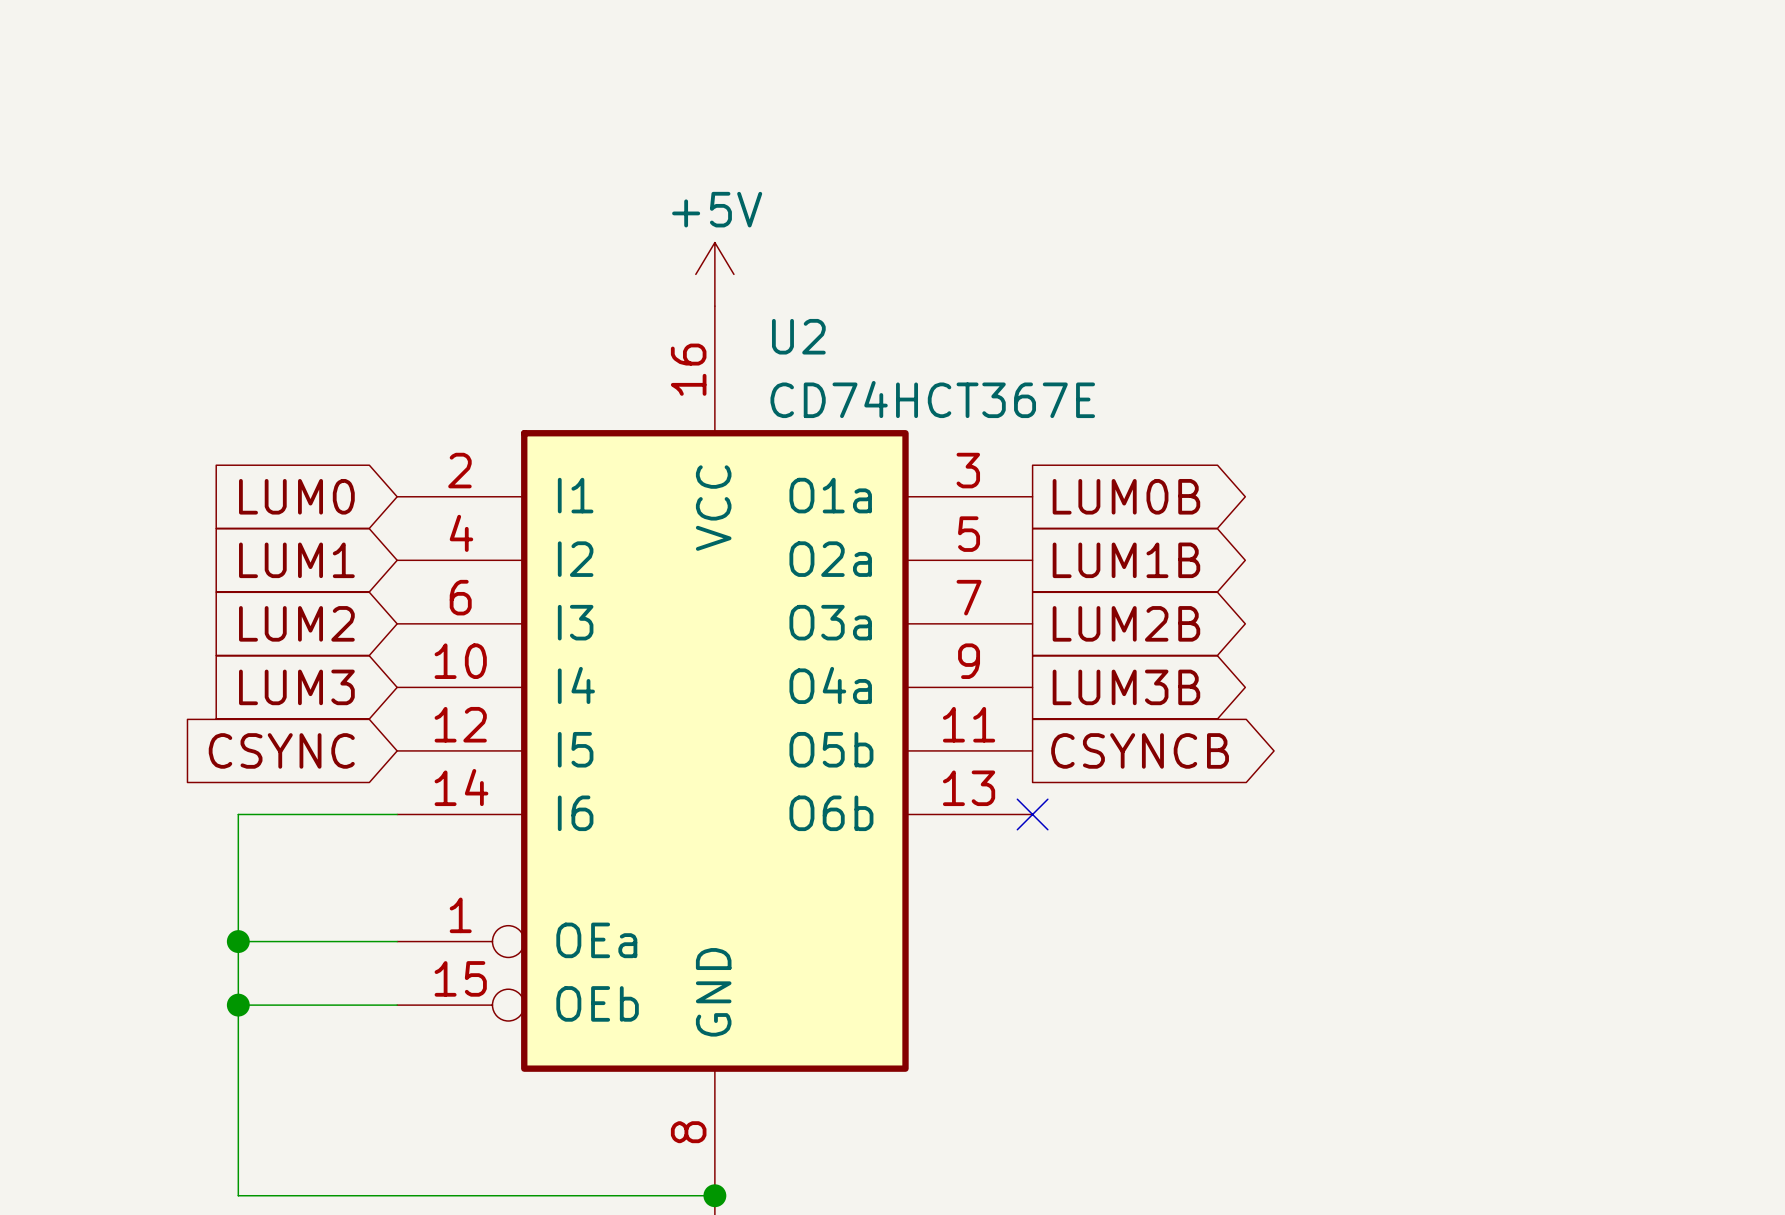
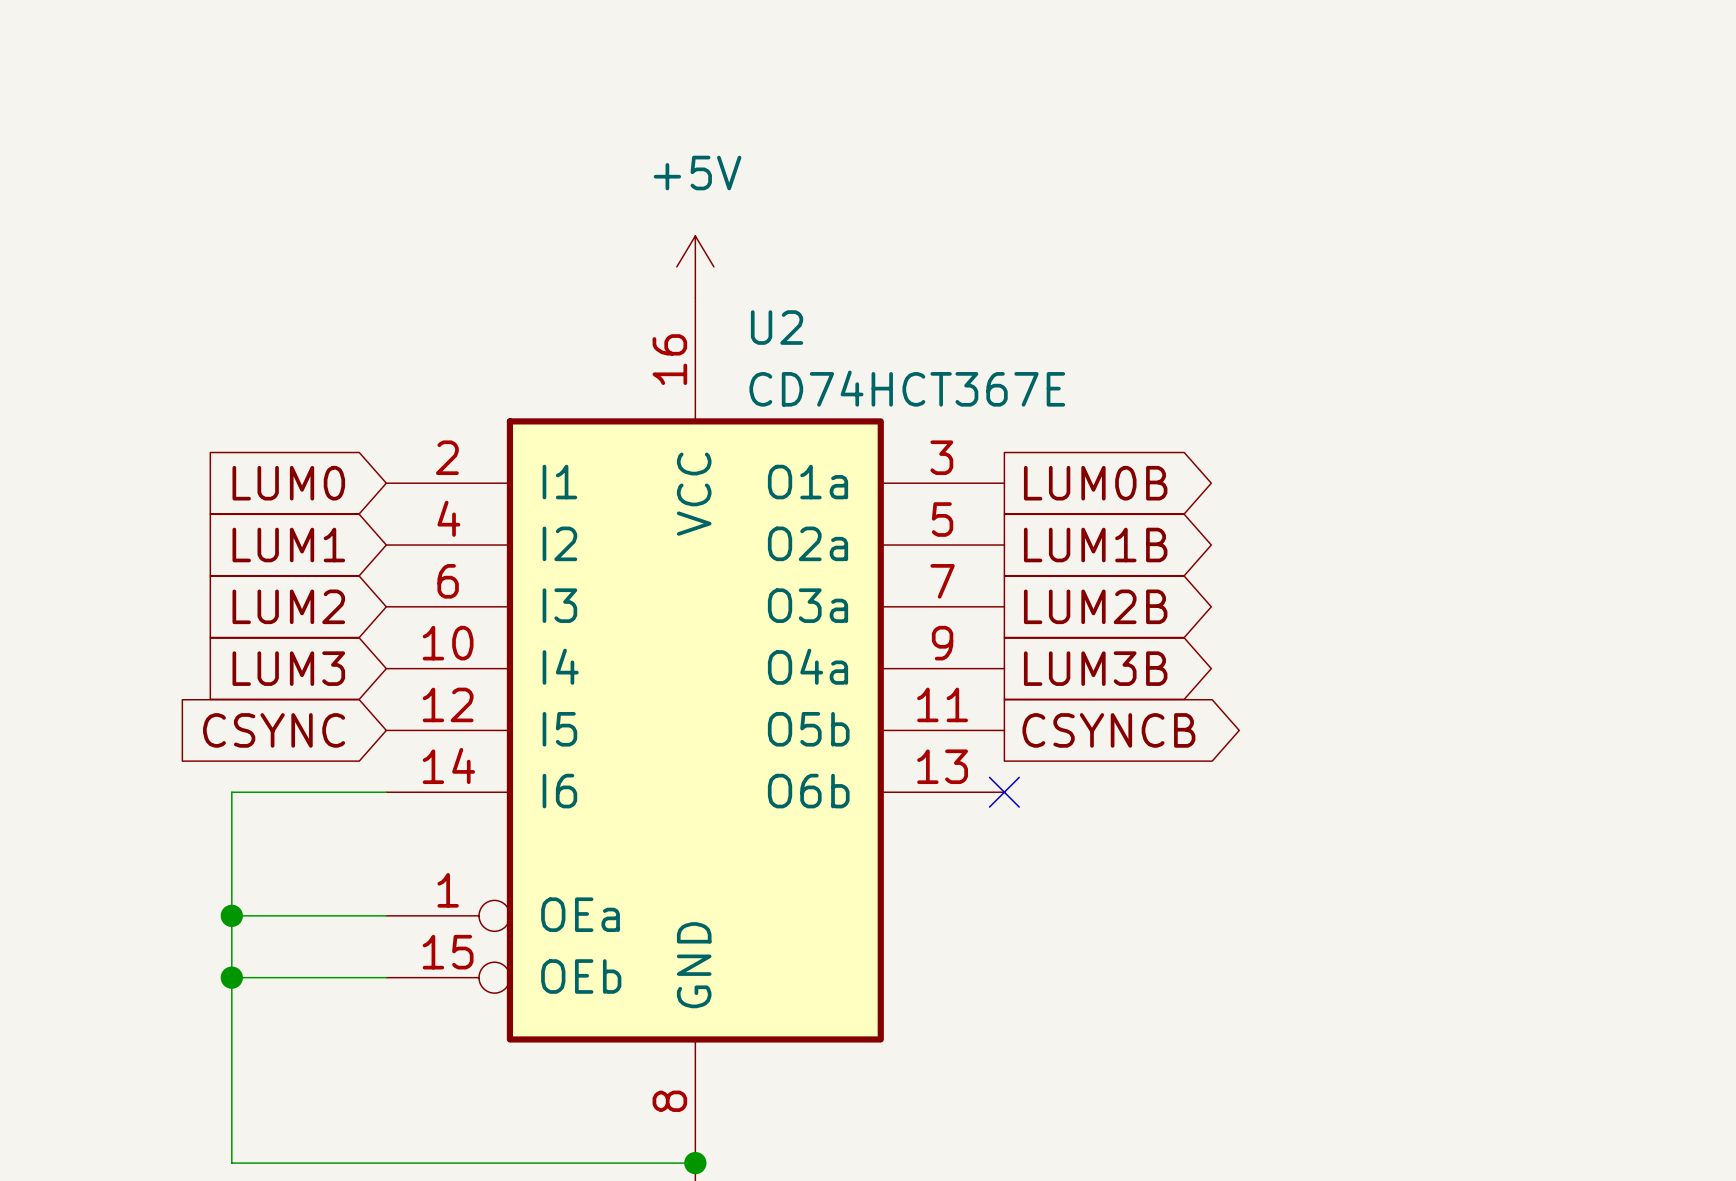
power symbol text position: +5V (717, 209) -> +5V (697, 173)

